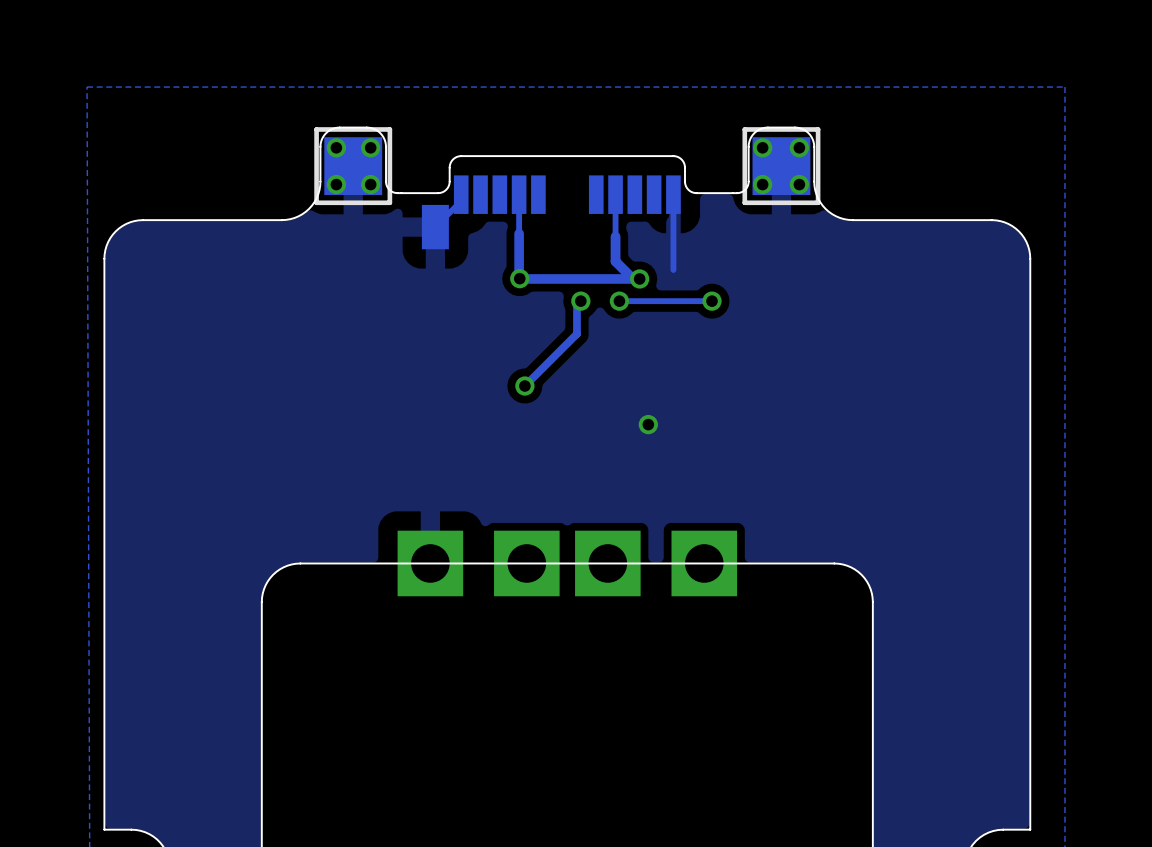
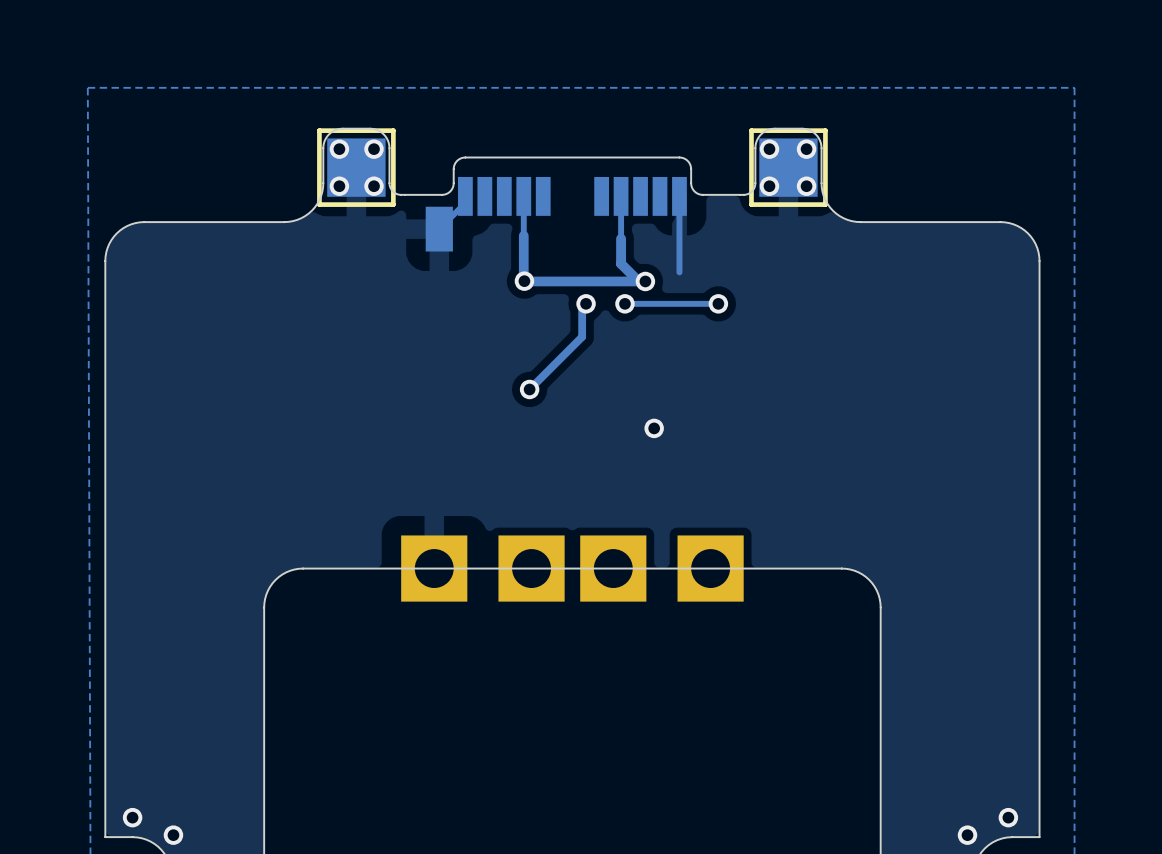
via: none -> (132, 817)
via: none -> (1008, 817)
via: none -> (173, 835)
via: none -> (967, 835)

